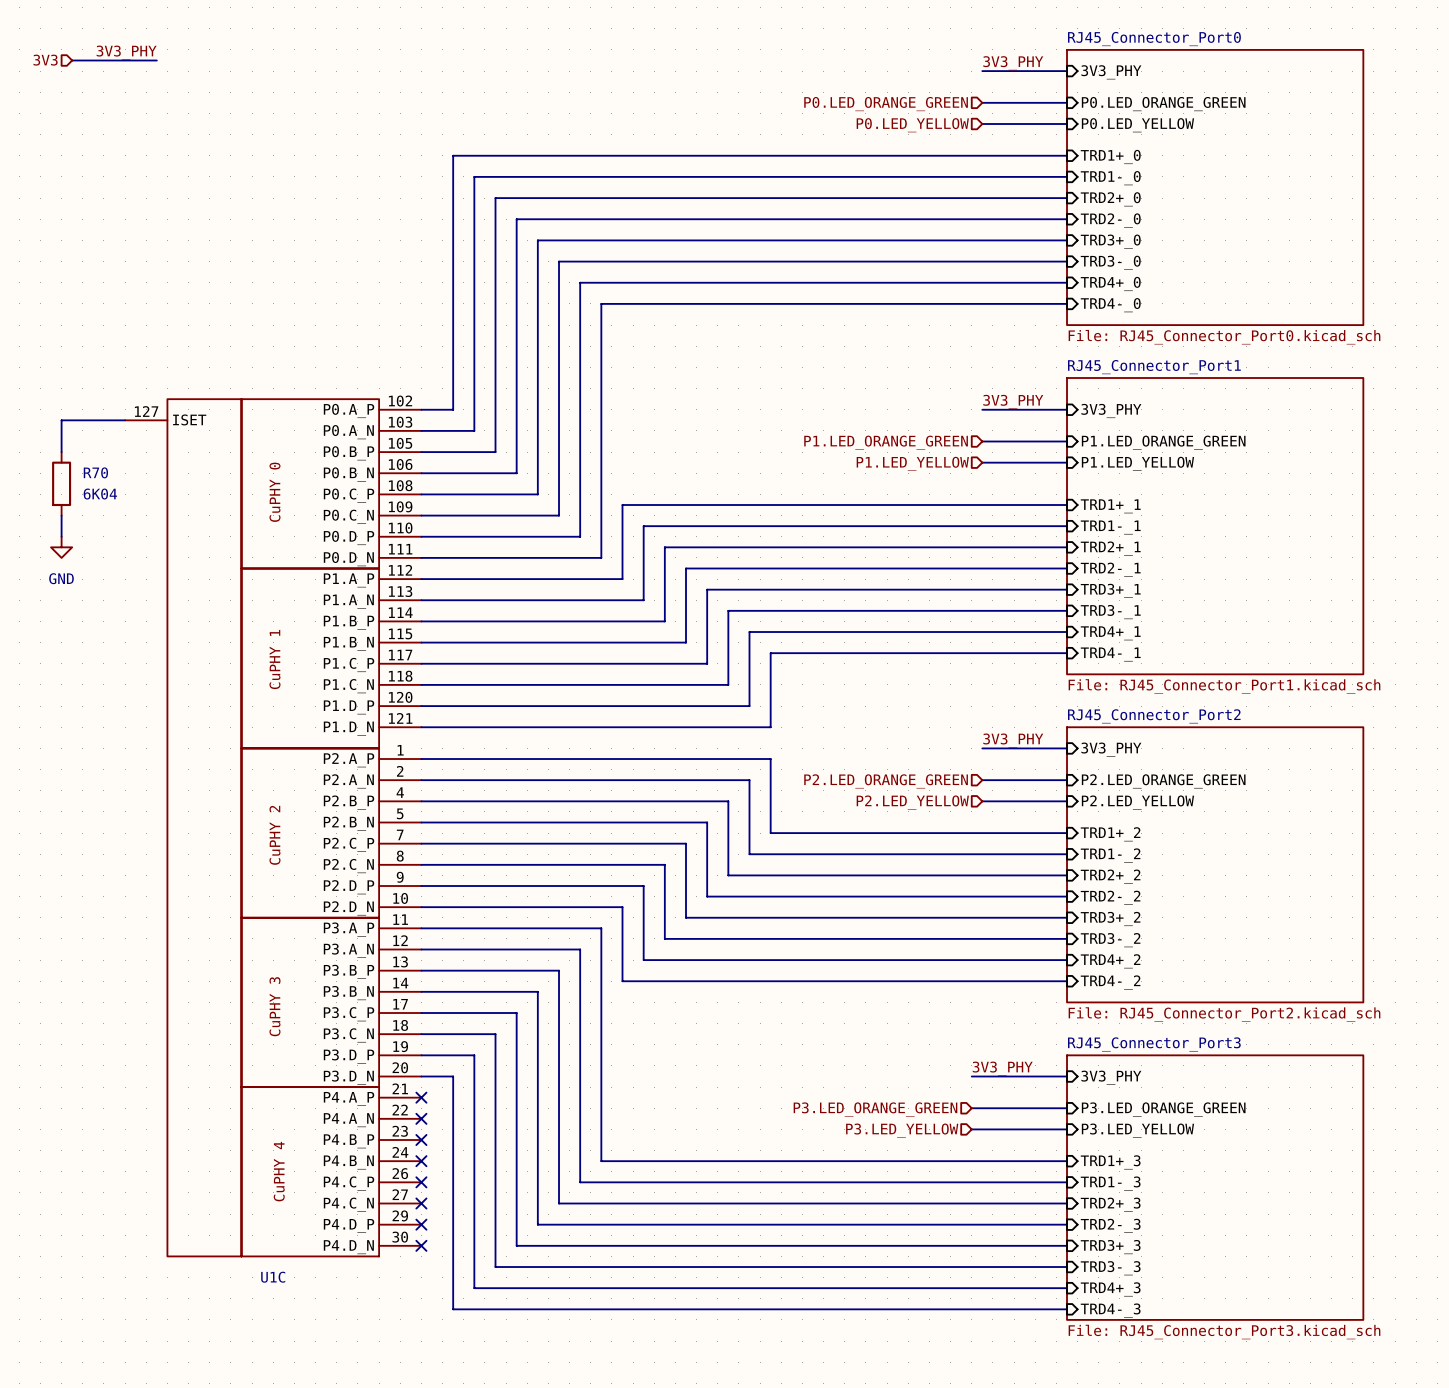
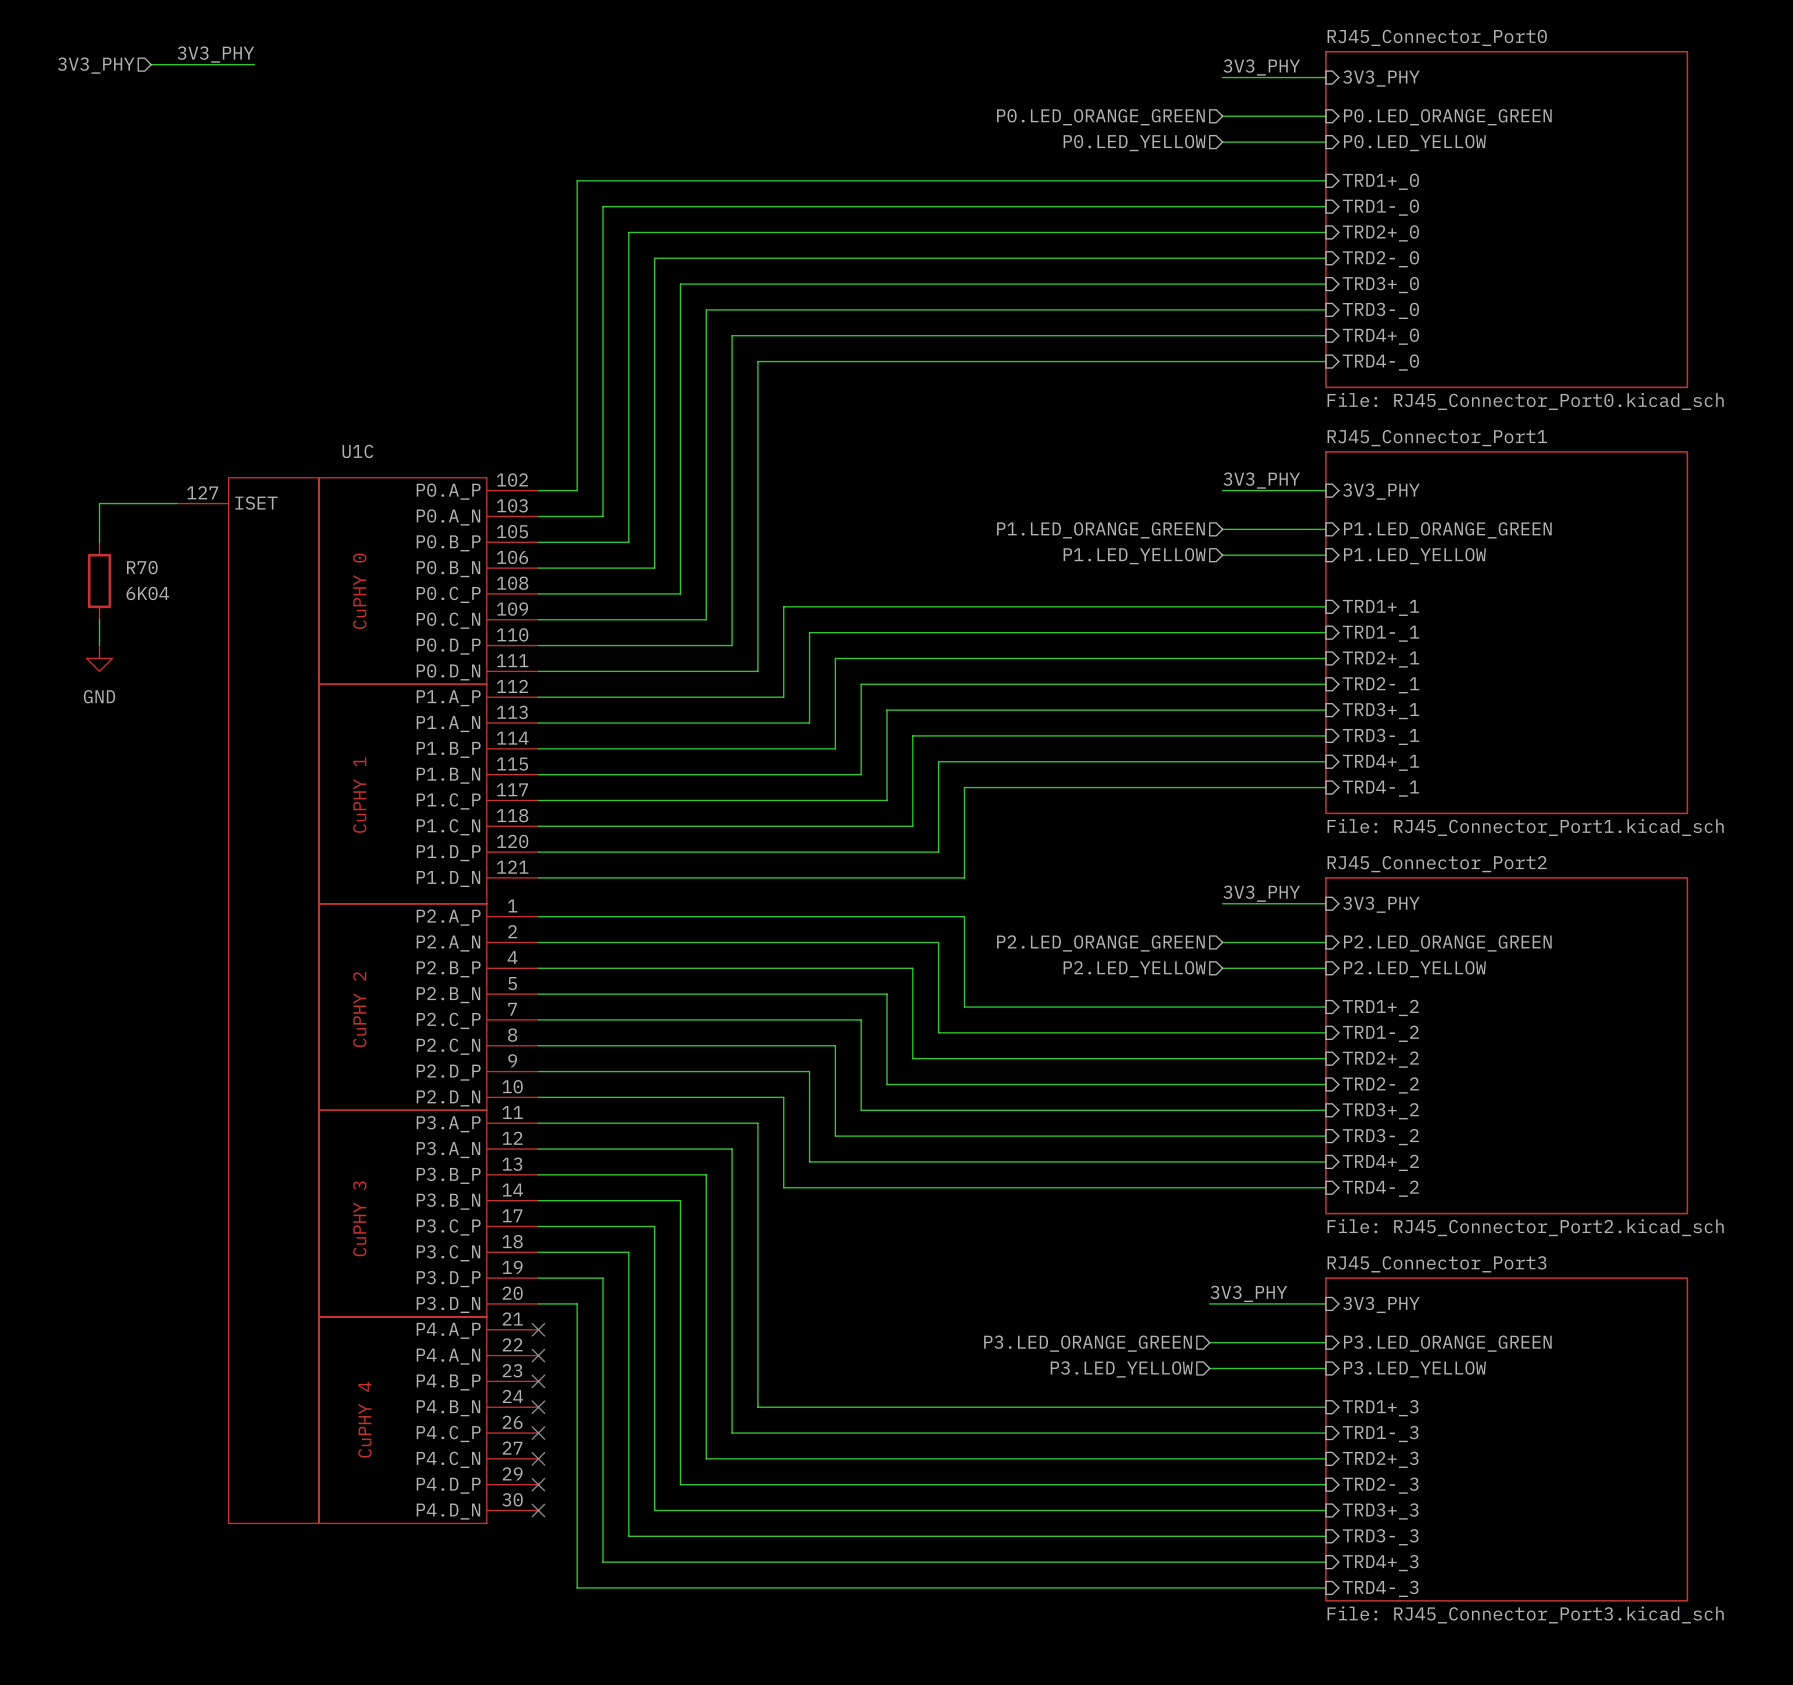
label position: 3V3_PHY (126, 52) -> 3V3_PHY (215, 54)
hierarchical label: 3V3 (45, 60) -> none
wire: (72, 60) (103, 60) -> (215, 64) (254, 64)
hierarchical label: none -> 3V3_PHY (96, 65)
U1C name position: U1C (273, 1277) -> U1C (357, 451)

